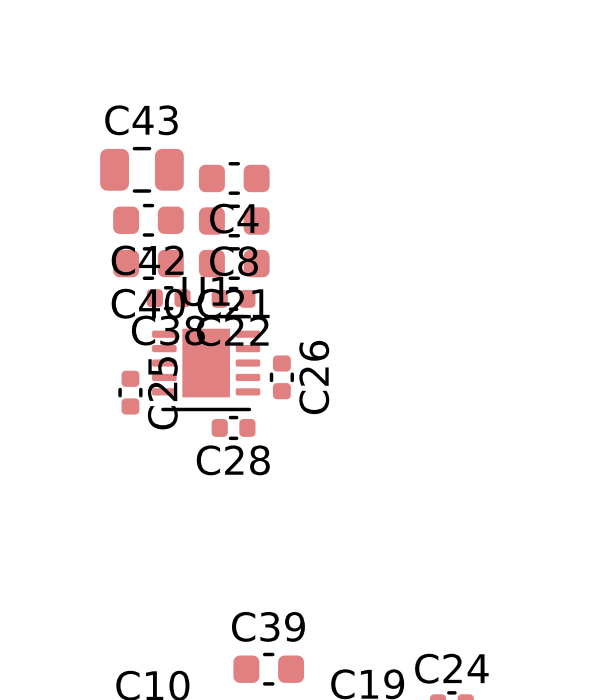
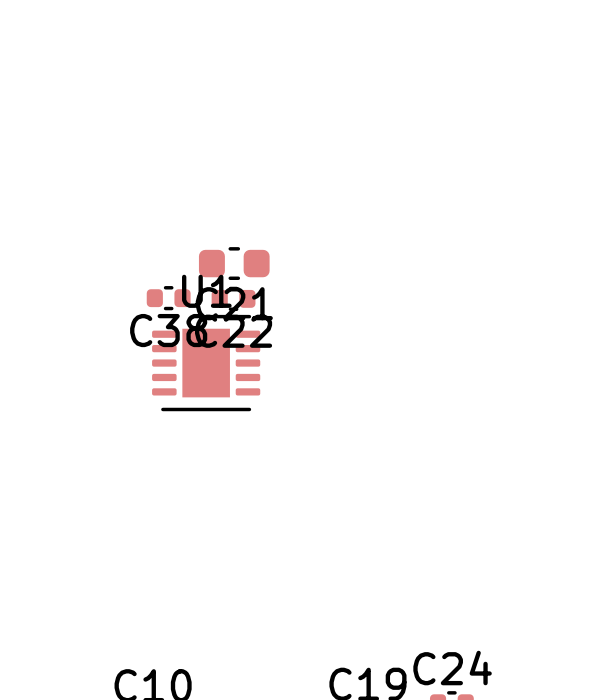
C43: (141, 169) -> none
C4: (234, 178) -> none
C42: (148, 220) -> none
C8: (234, 221) -> none
C40: (148, 263) -> none
C26: (281, 377) -> none
C25: (130, 392) -> none
C28: (233, 427) -> none
C39: (268, 669) -> none

